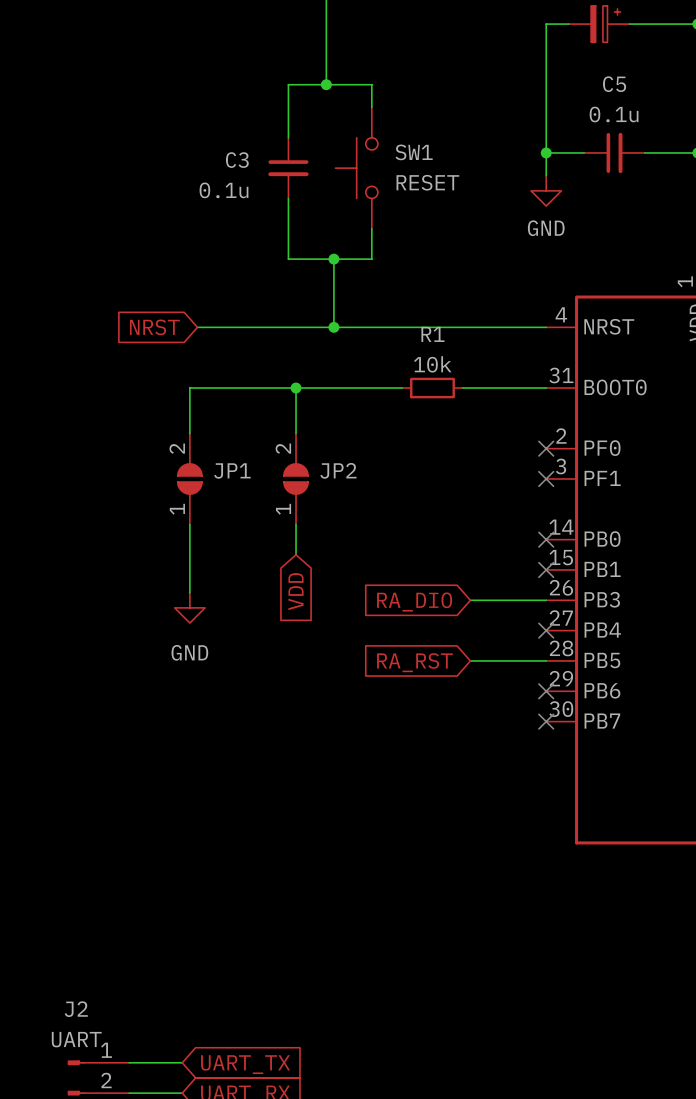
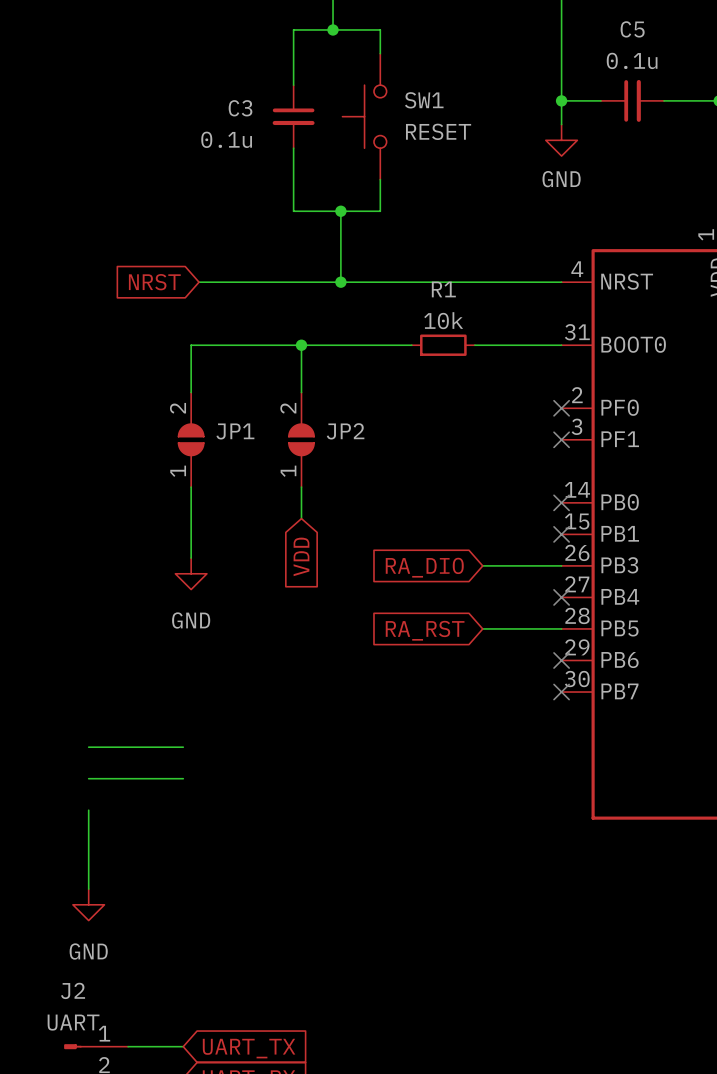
wire: none -> (88, 747) (183, 747)
wire: none -> (88, 778) (183, 778)
wire: none -> (88, 810) (88, 889)
power symbol: none -> GND (88, 904)

